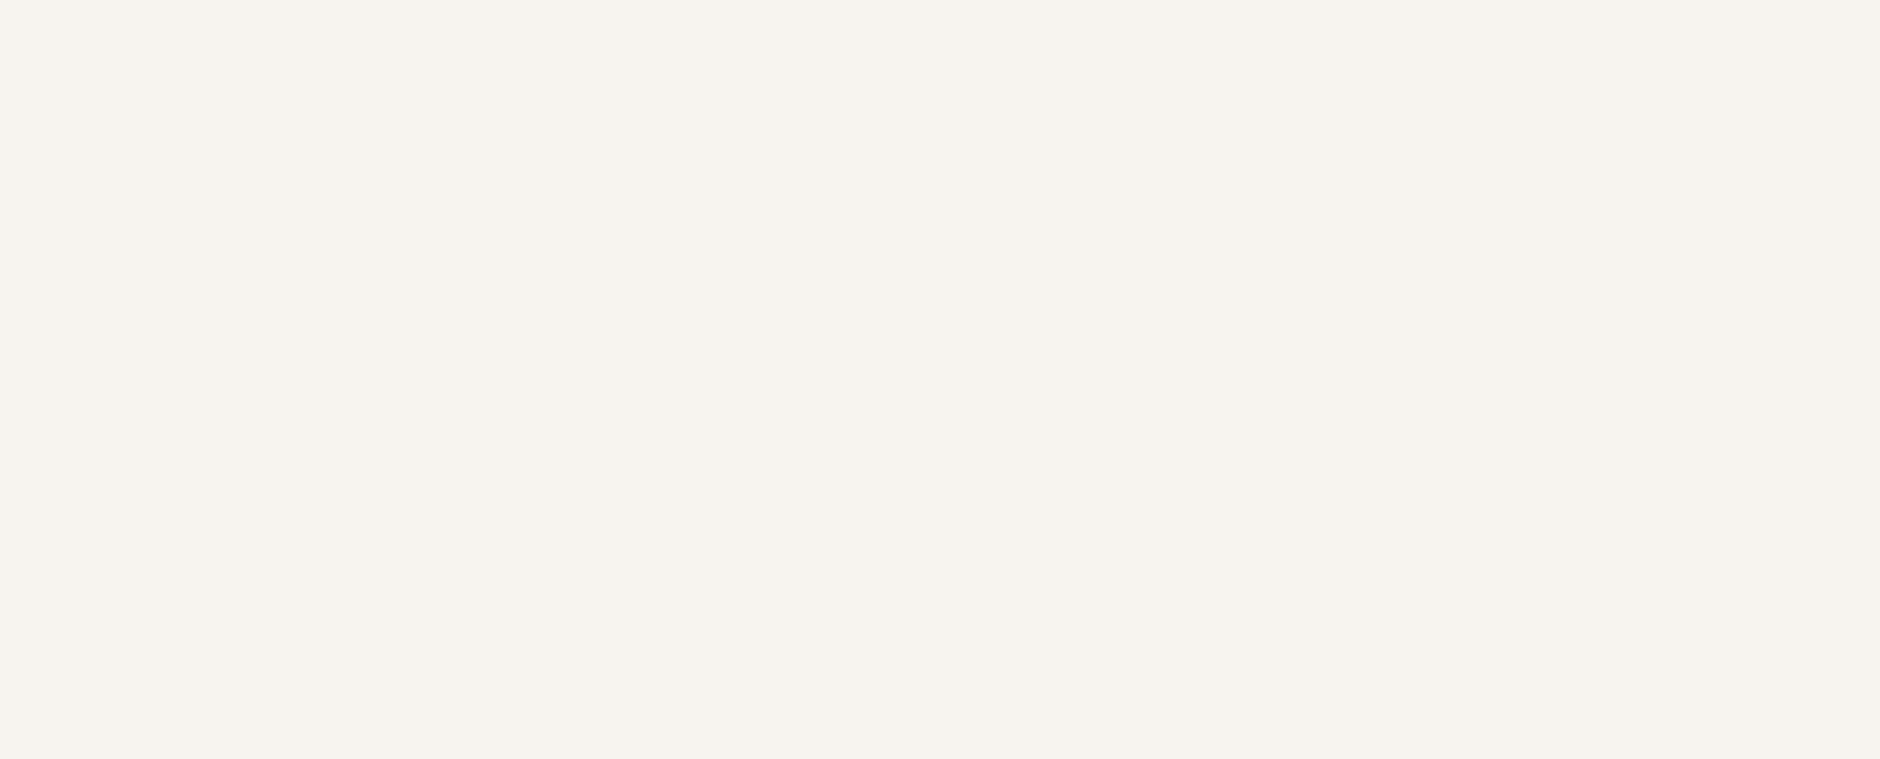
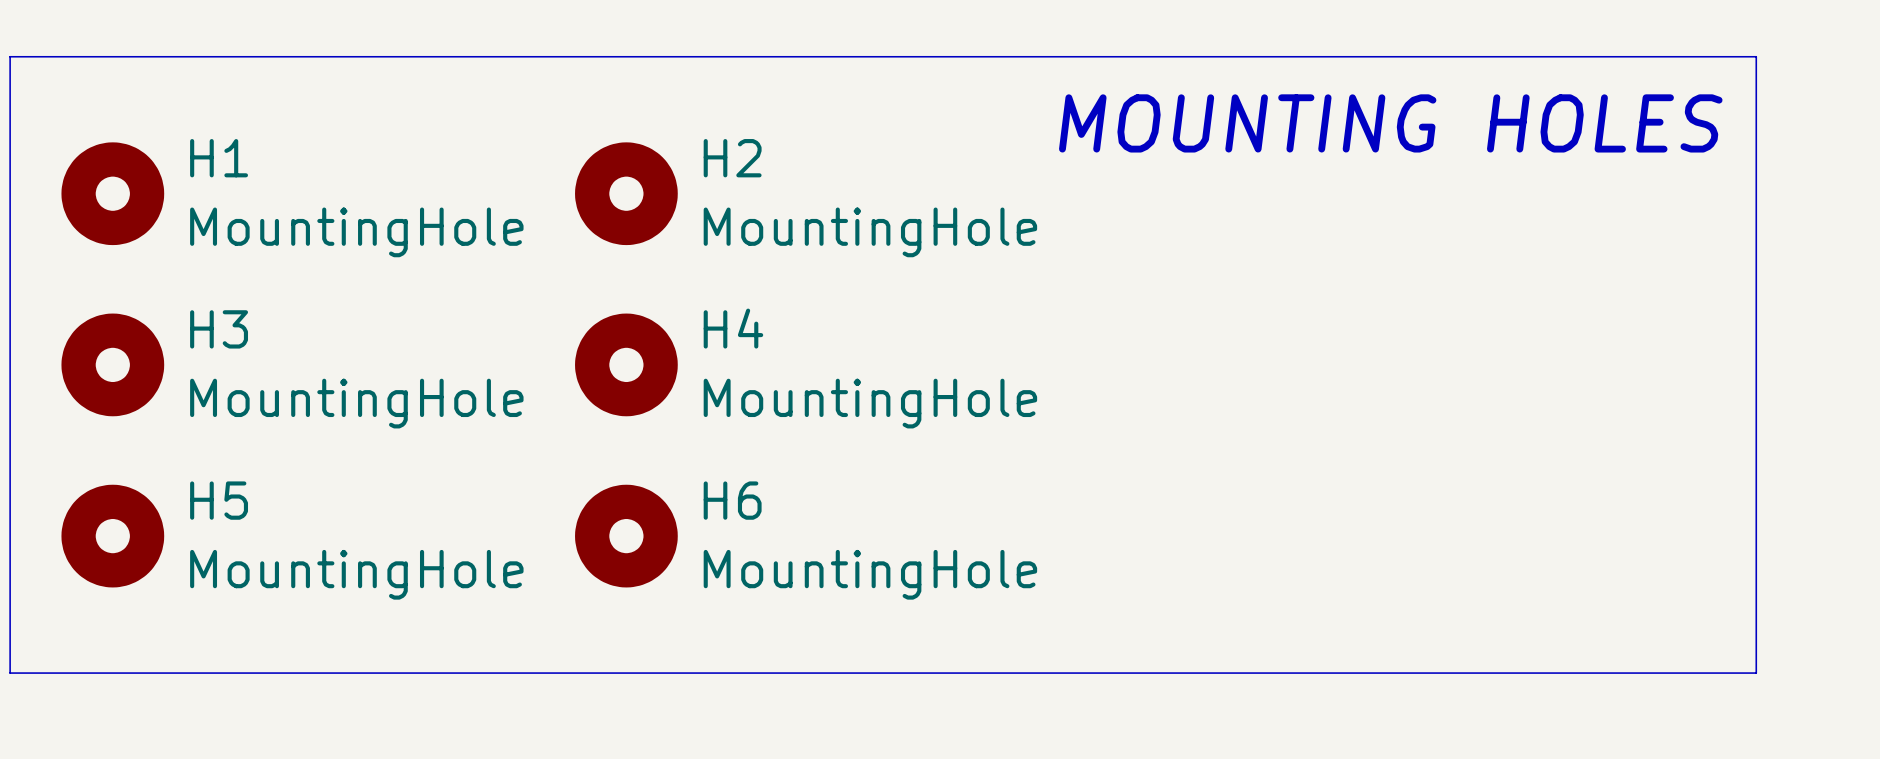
line: none -> (10, 56) (1756, 56) (1756, 673) (10, 673) (10, 56)
text: none -> MOUNTING HOLES (1390, 123)
H1: none -> MountingHole (112, 193)
H2: none -> MountingHole (626, 193)
H3: none -> MountingHole (112, 364)
H4: none -> MountingHole (626, 364)
H5: none -> MountingHole (112, 536)
H6: none -> MountingHole (626, 536)

